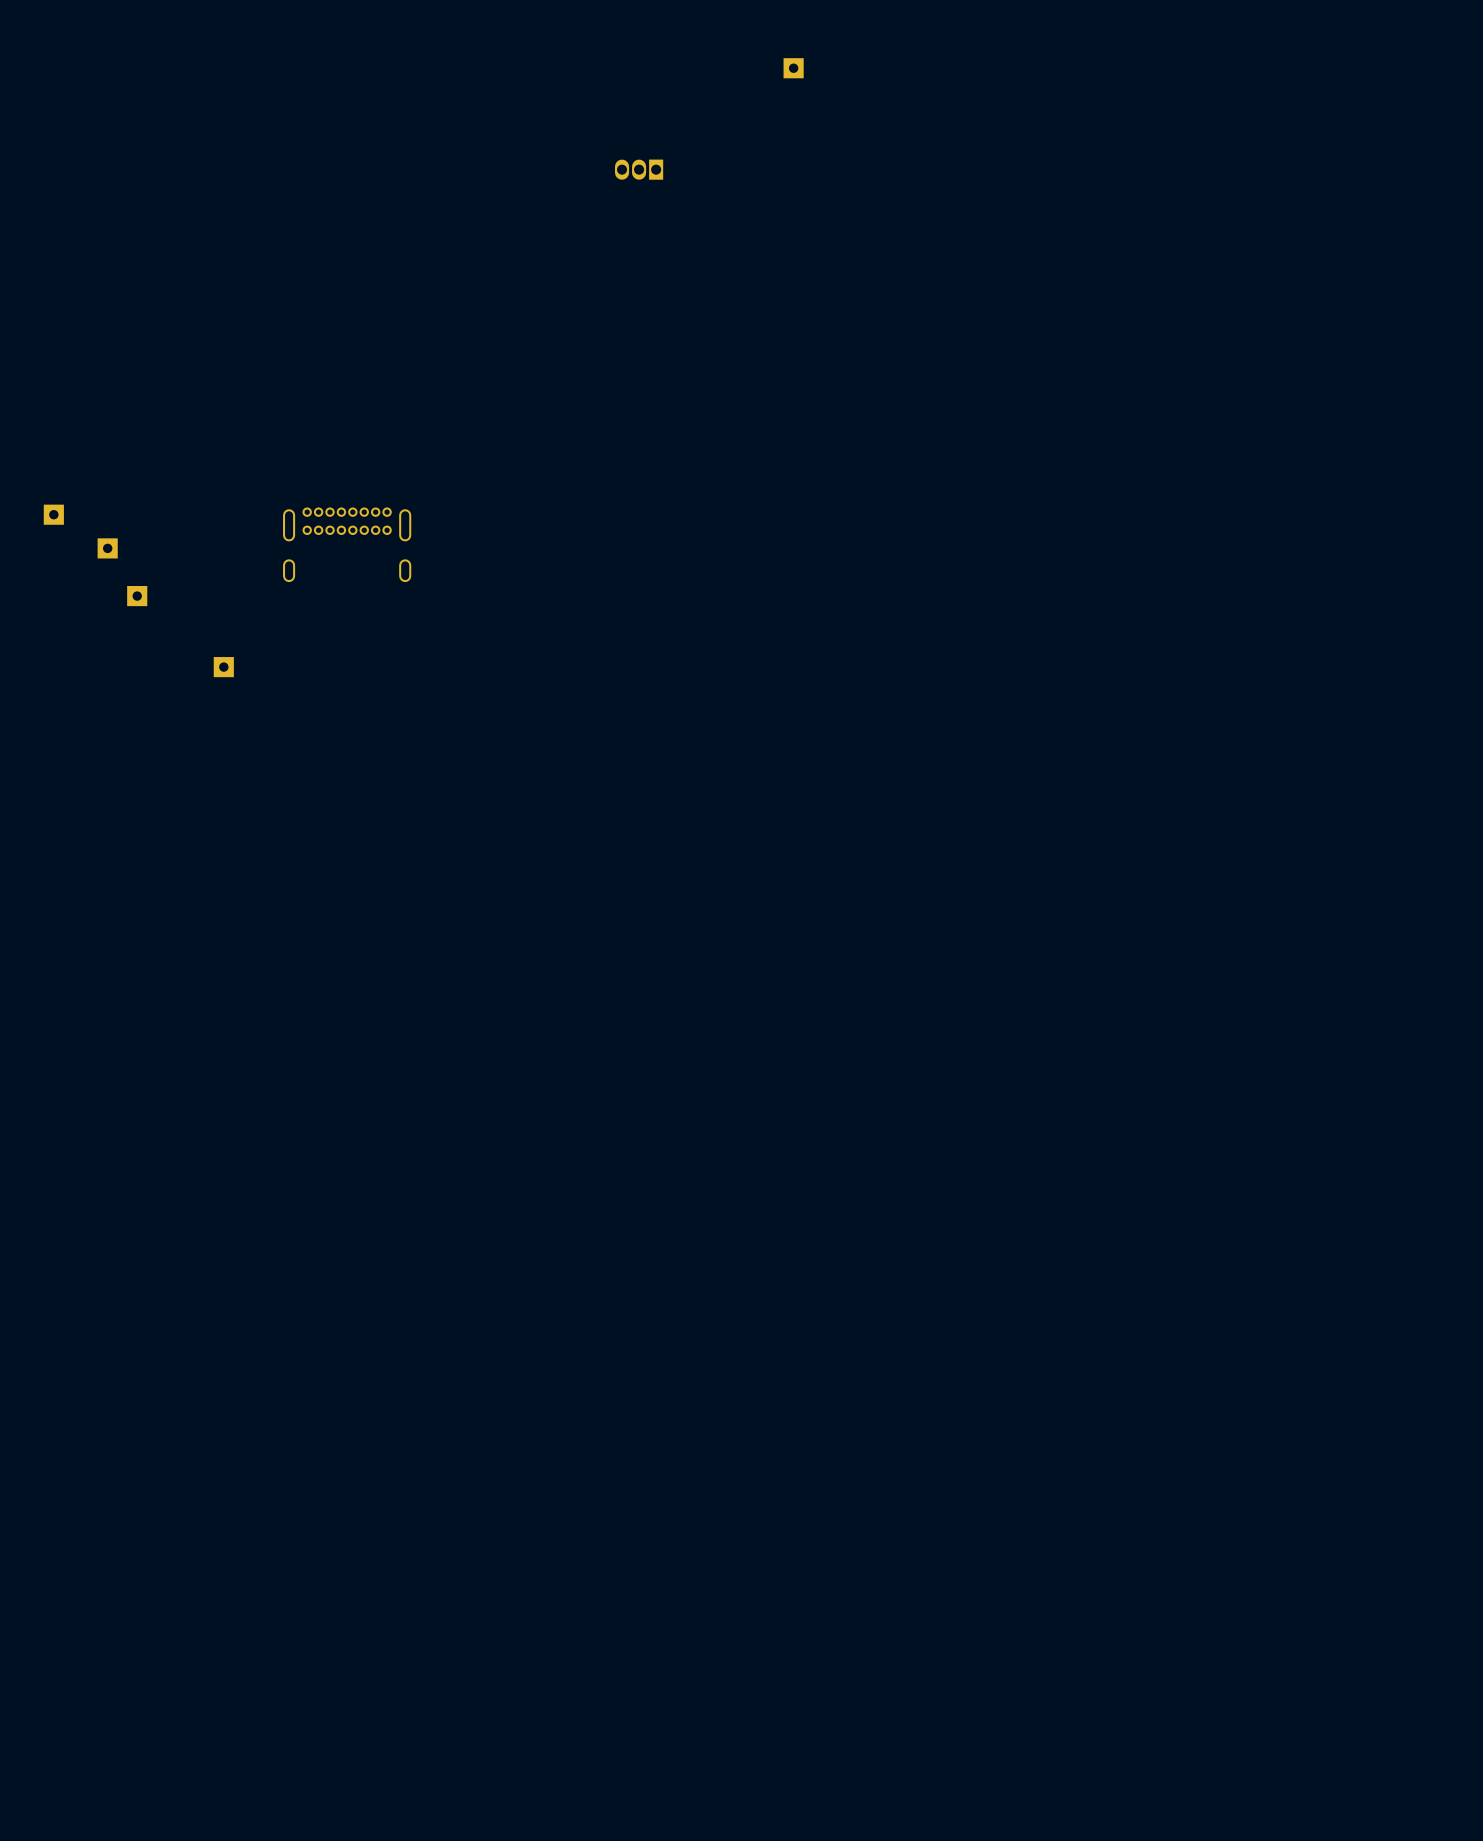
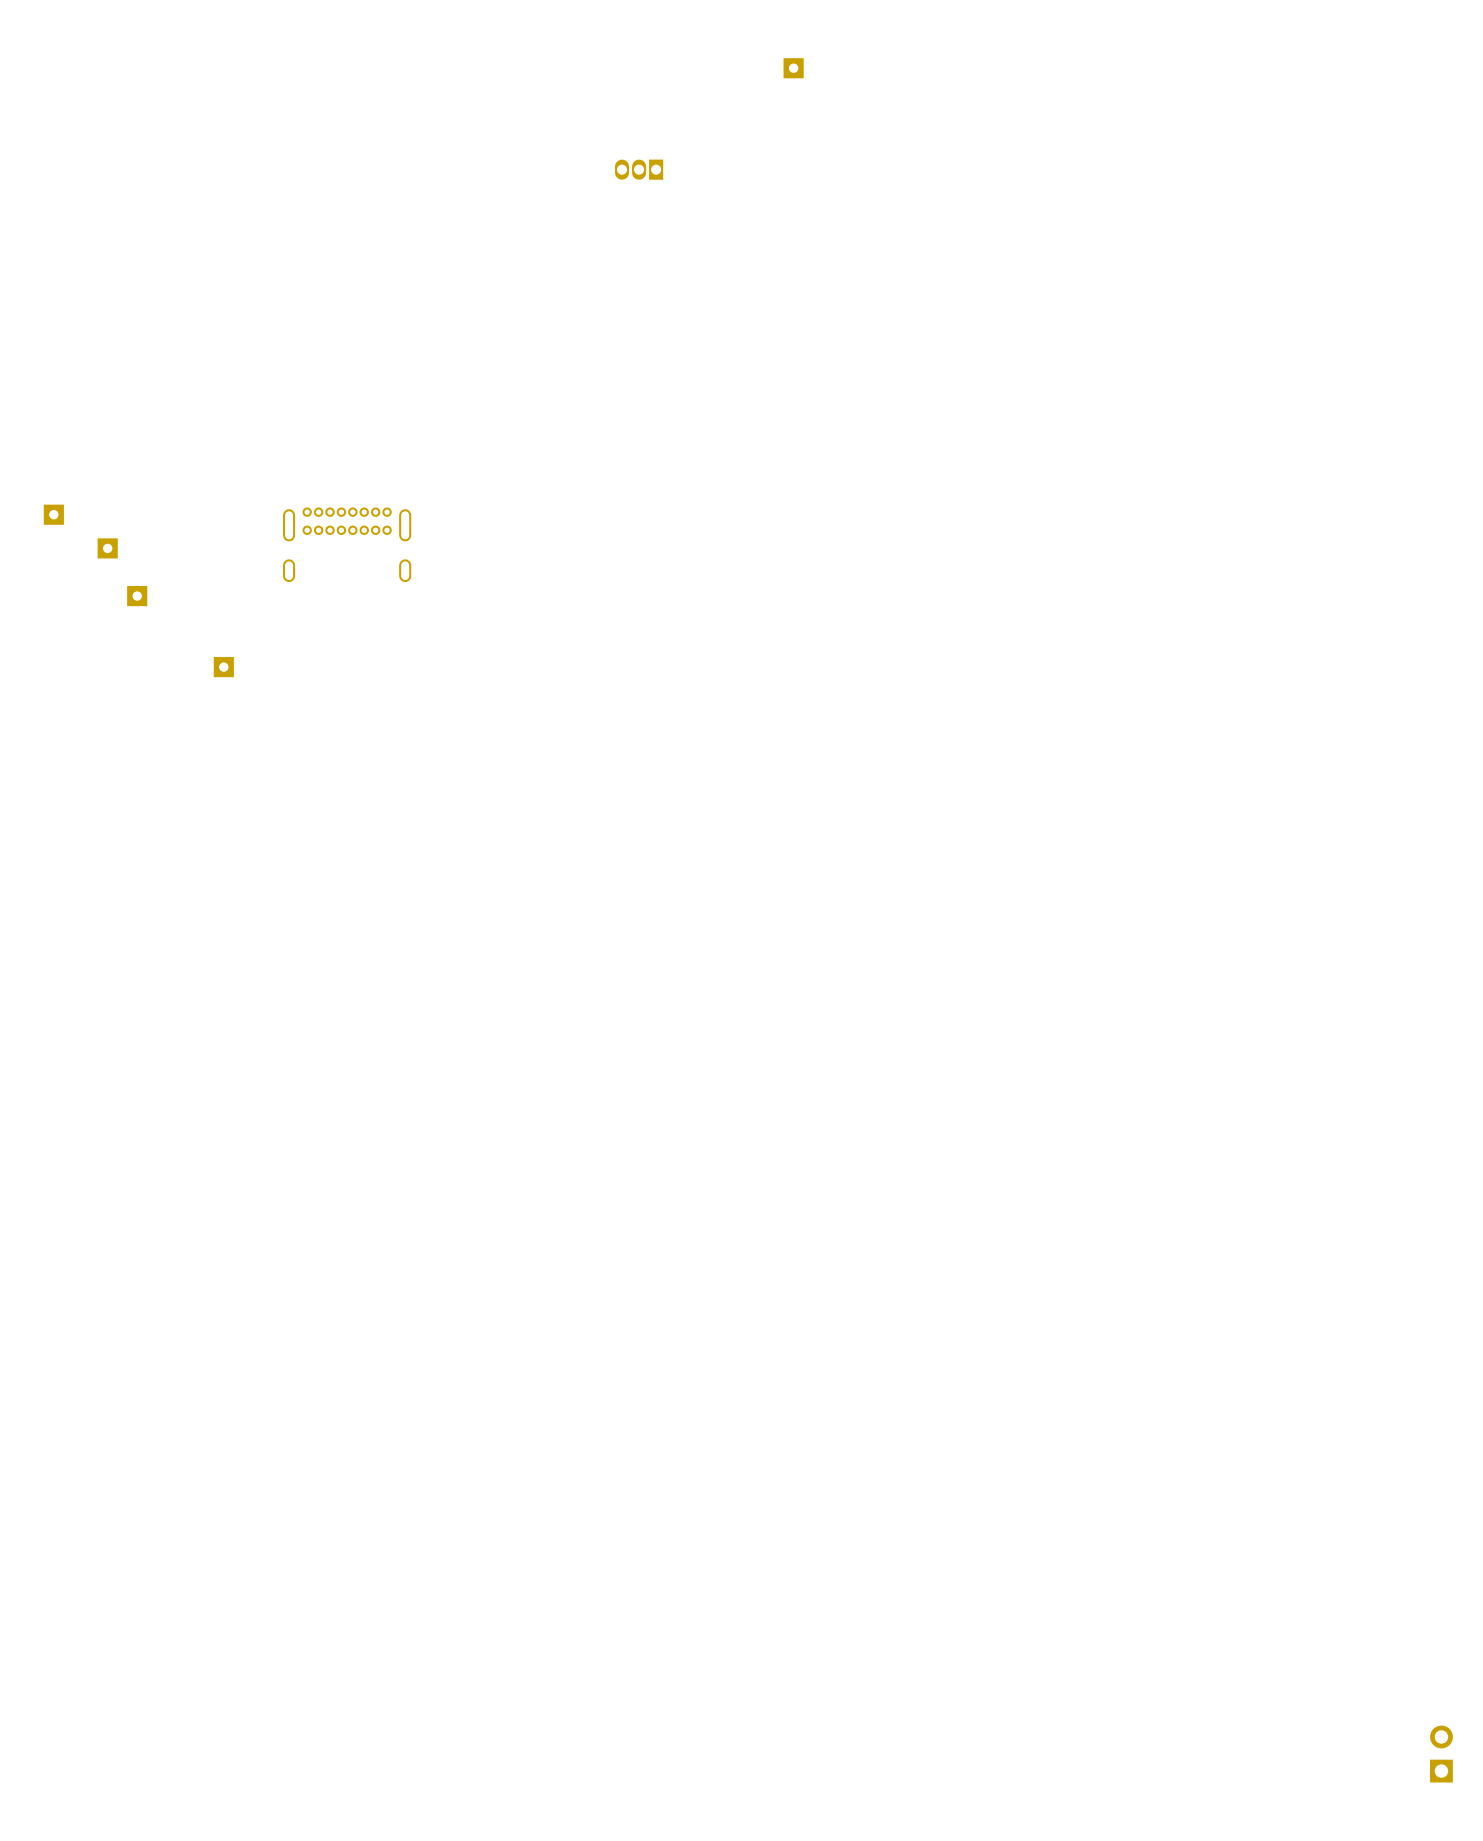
part: none -> (1441, 1754)

